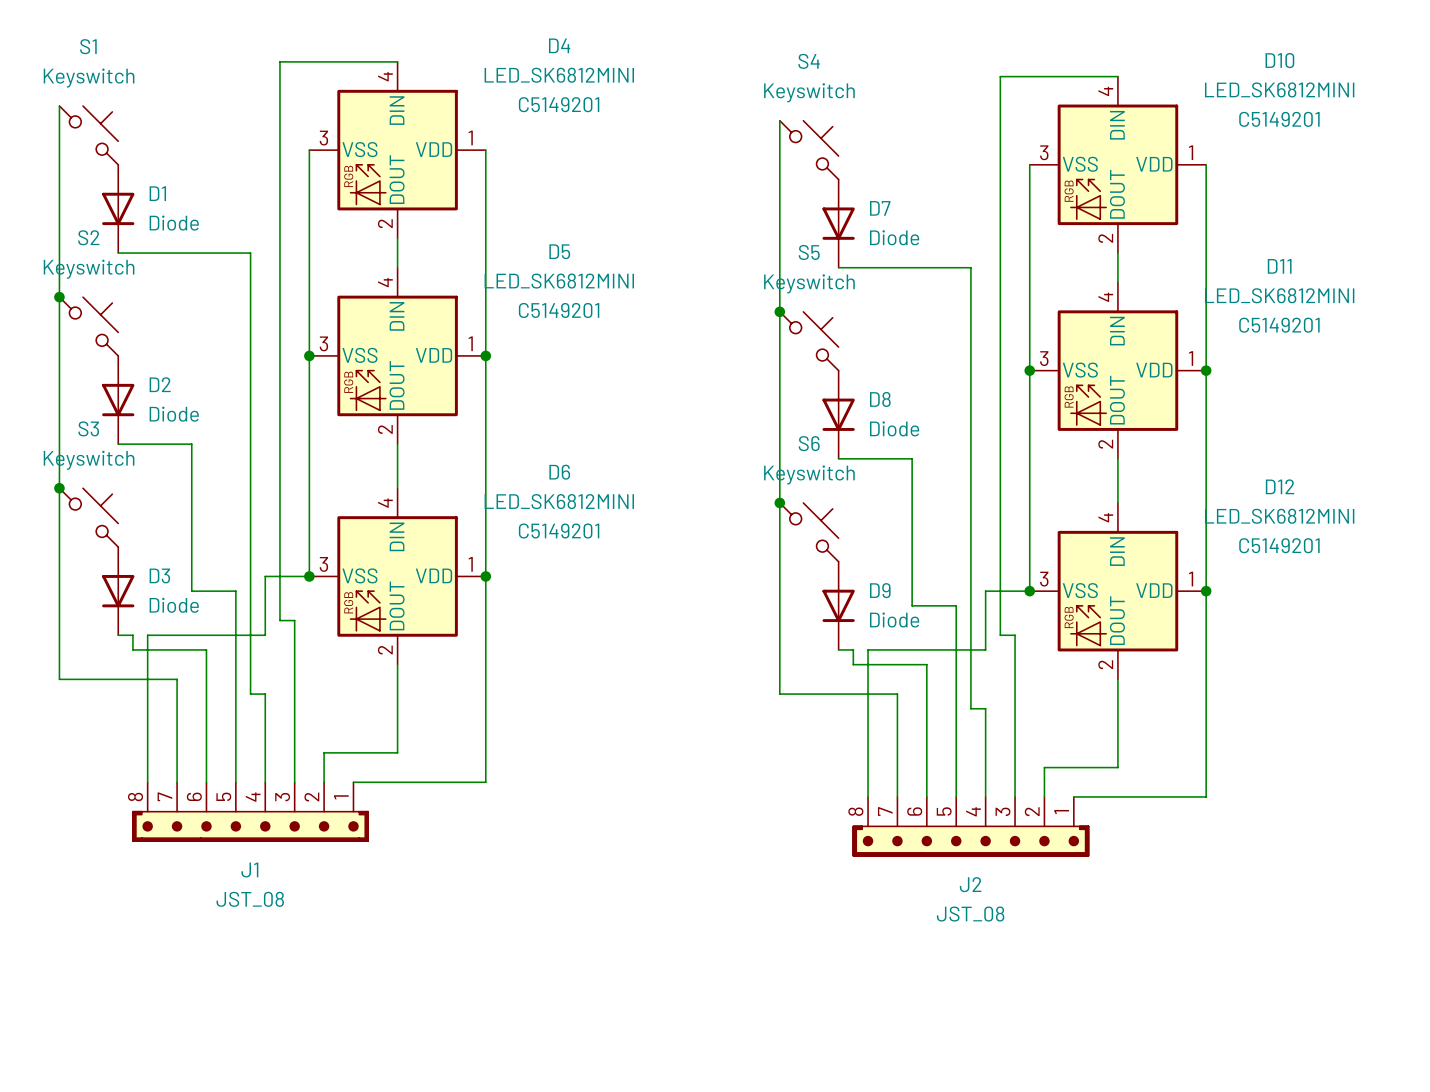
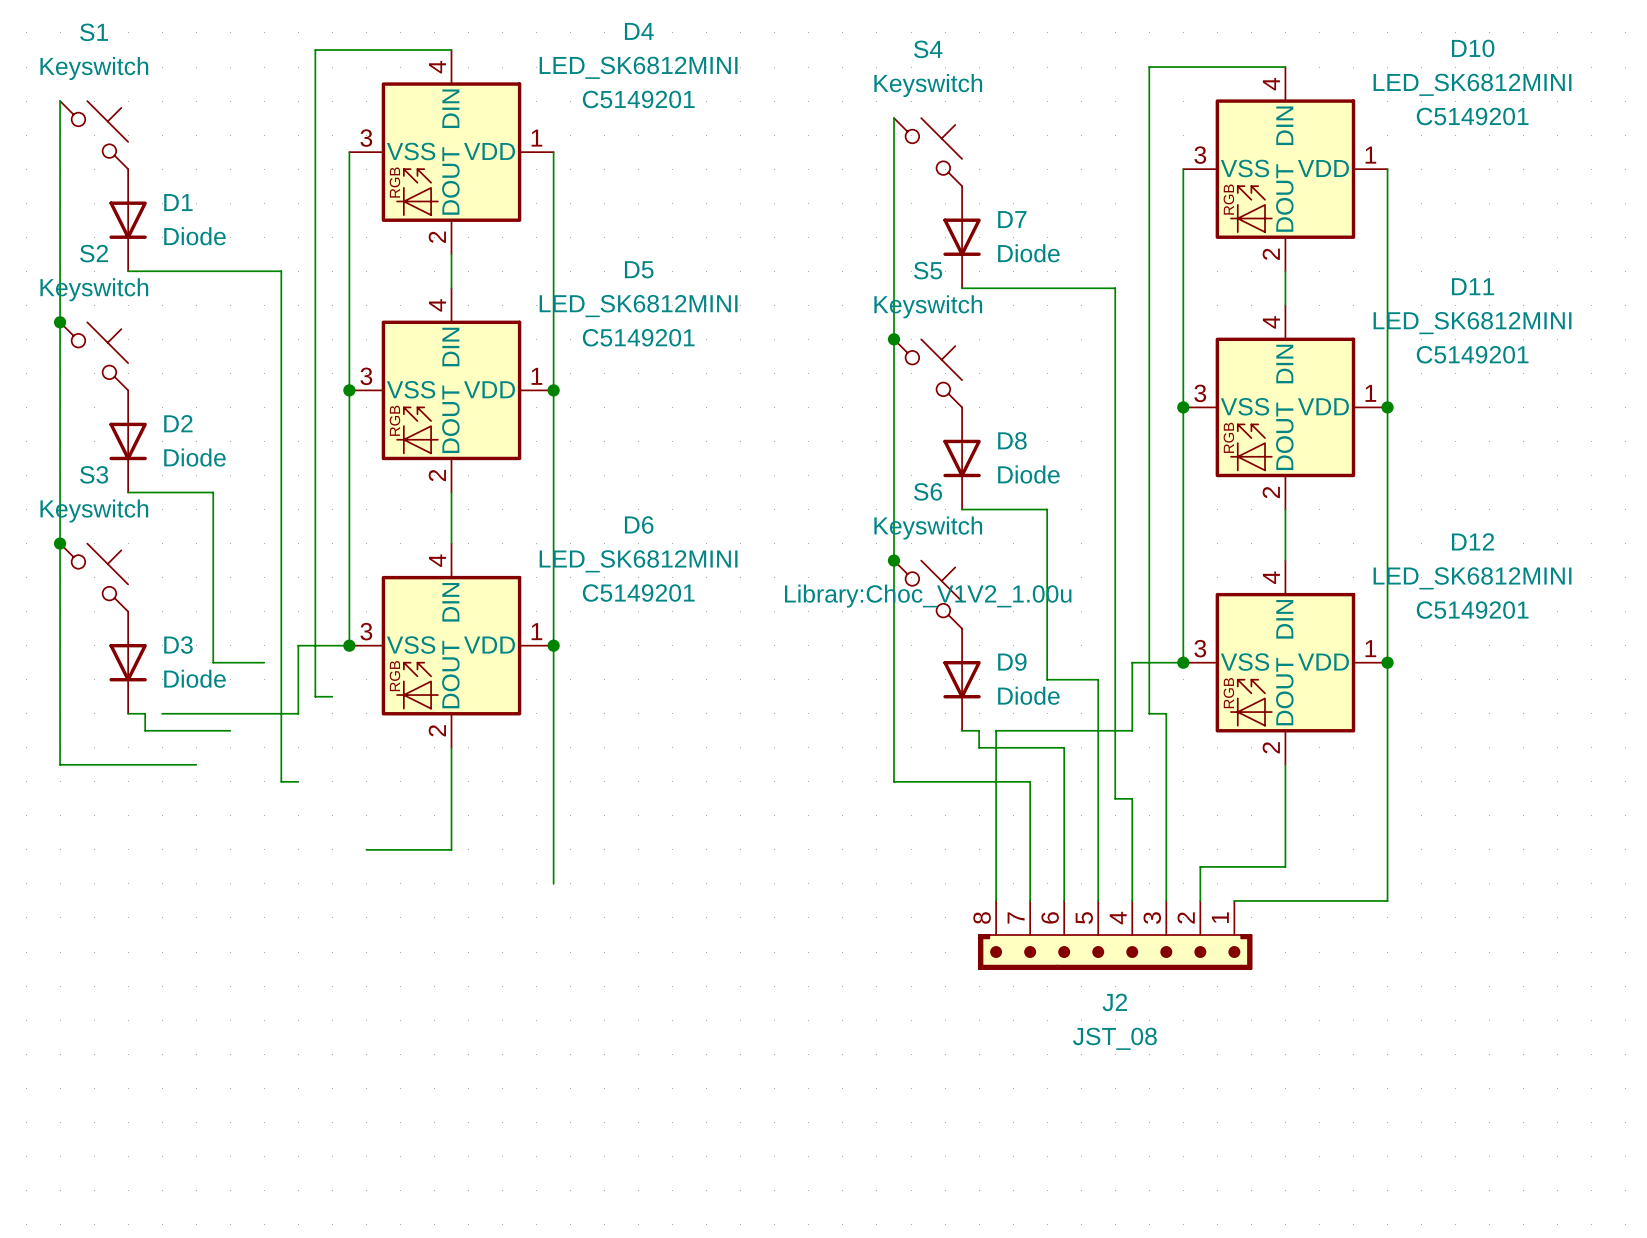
S6 text: none -> Library:Choc_V1V2_1.00u (928, 596)
wire: (235, 591) (235, 782) -> none
wire: (294, 620) (294, 782) -> none
wire: (147, 635) (147, 782) -> none
wire: (206, 649) (206, 782) -> none
wire: (177, 679) (177, 782) -> none
wire: (265, 694) (265, 782) -> none
wire: (324, 752) (324, 782) -> none
wire: (353, 782) (485, 782) -> none
J1: JST_08 (250, 811) -> none

